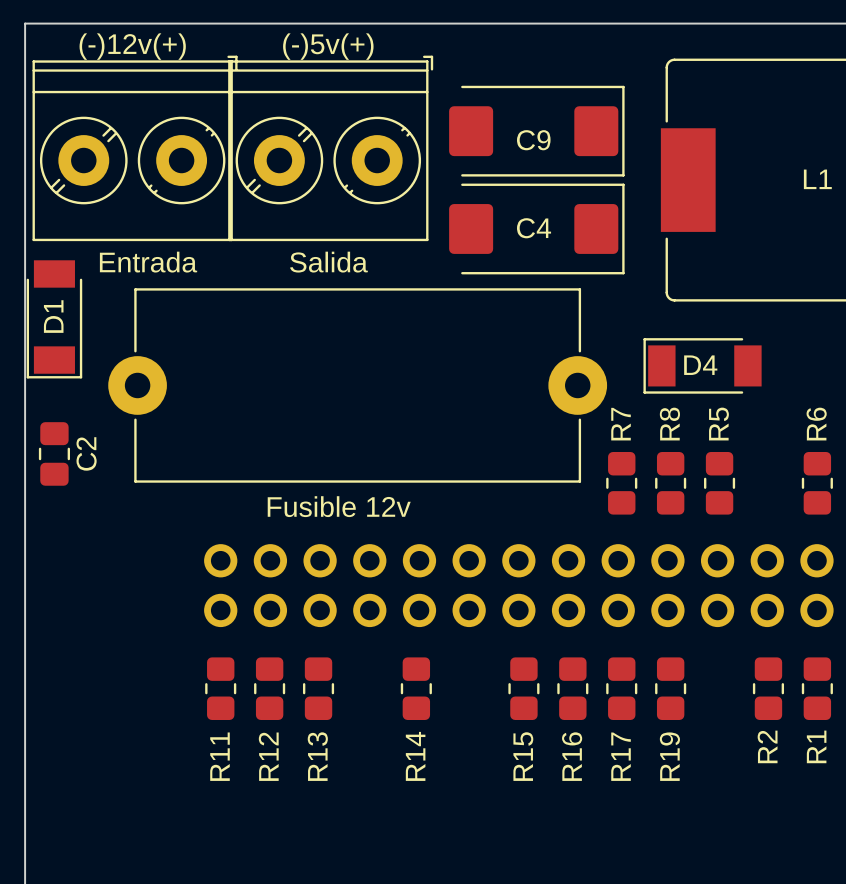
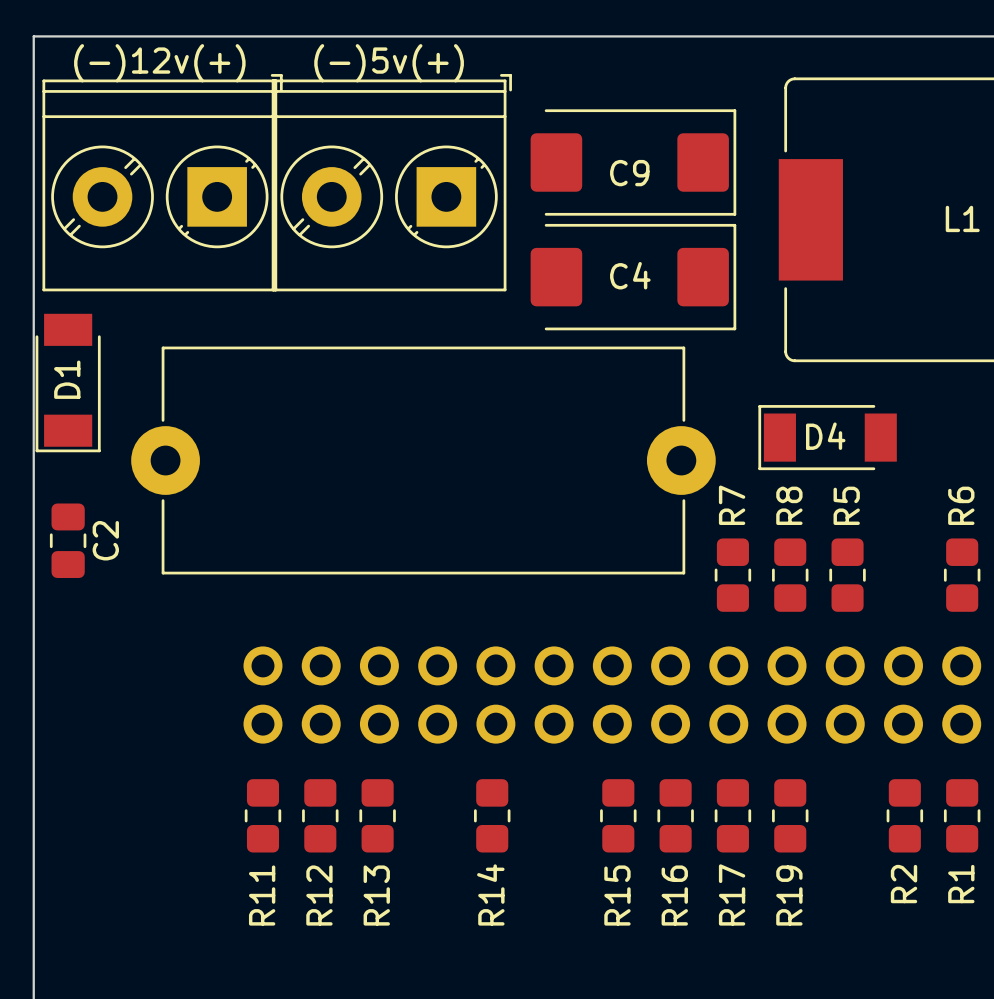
part footprint: [32, 55, 238, 242] -> [42, 74, 283, 292]
part footprint: [228, 55, 434, 242] -> [271, 74, 512, 292]
text: Entrada (148, 262) -> none
text: Salida (328, 262) -> none
text: Fusible 12v (339, 506) -> none

